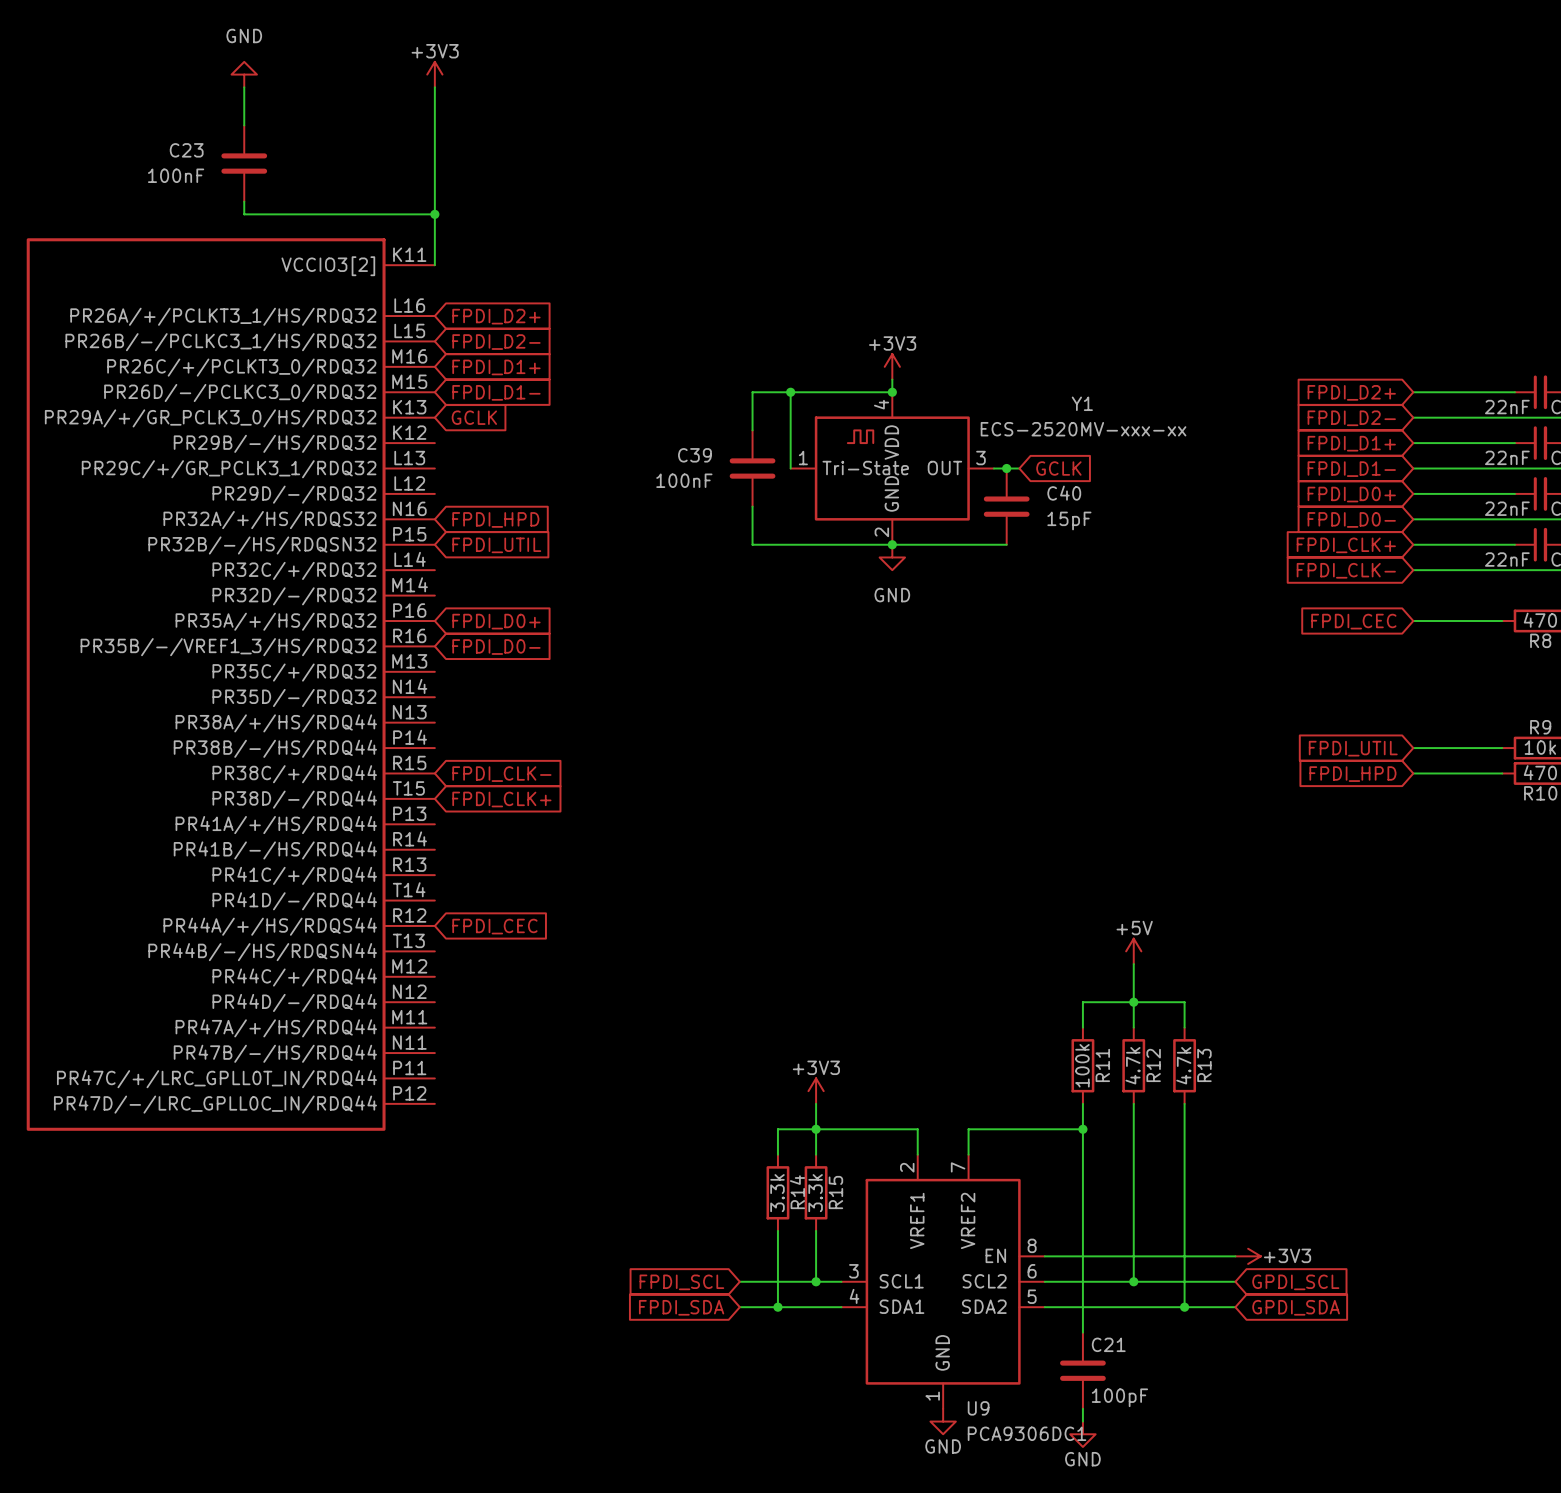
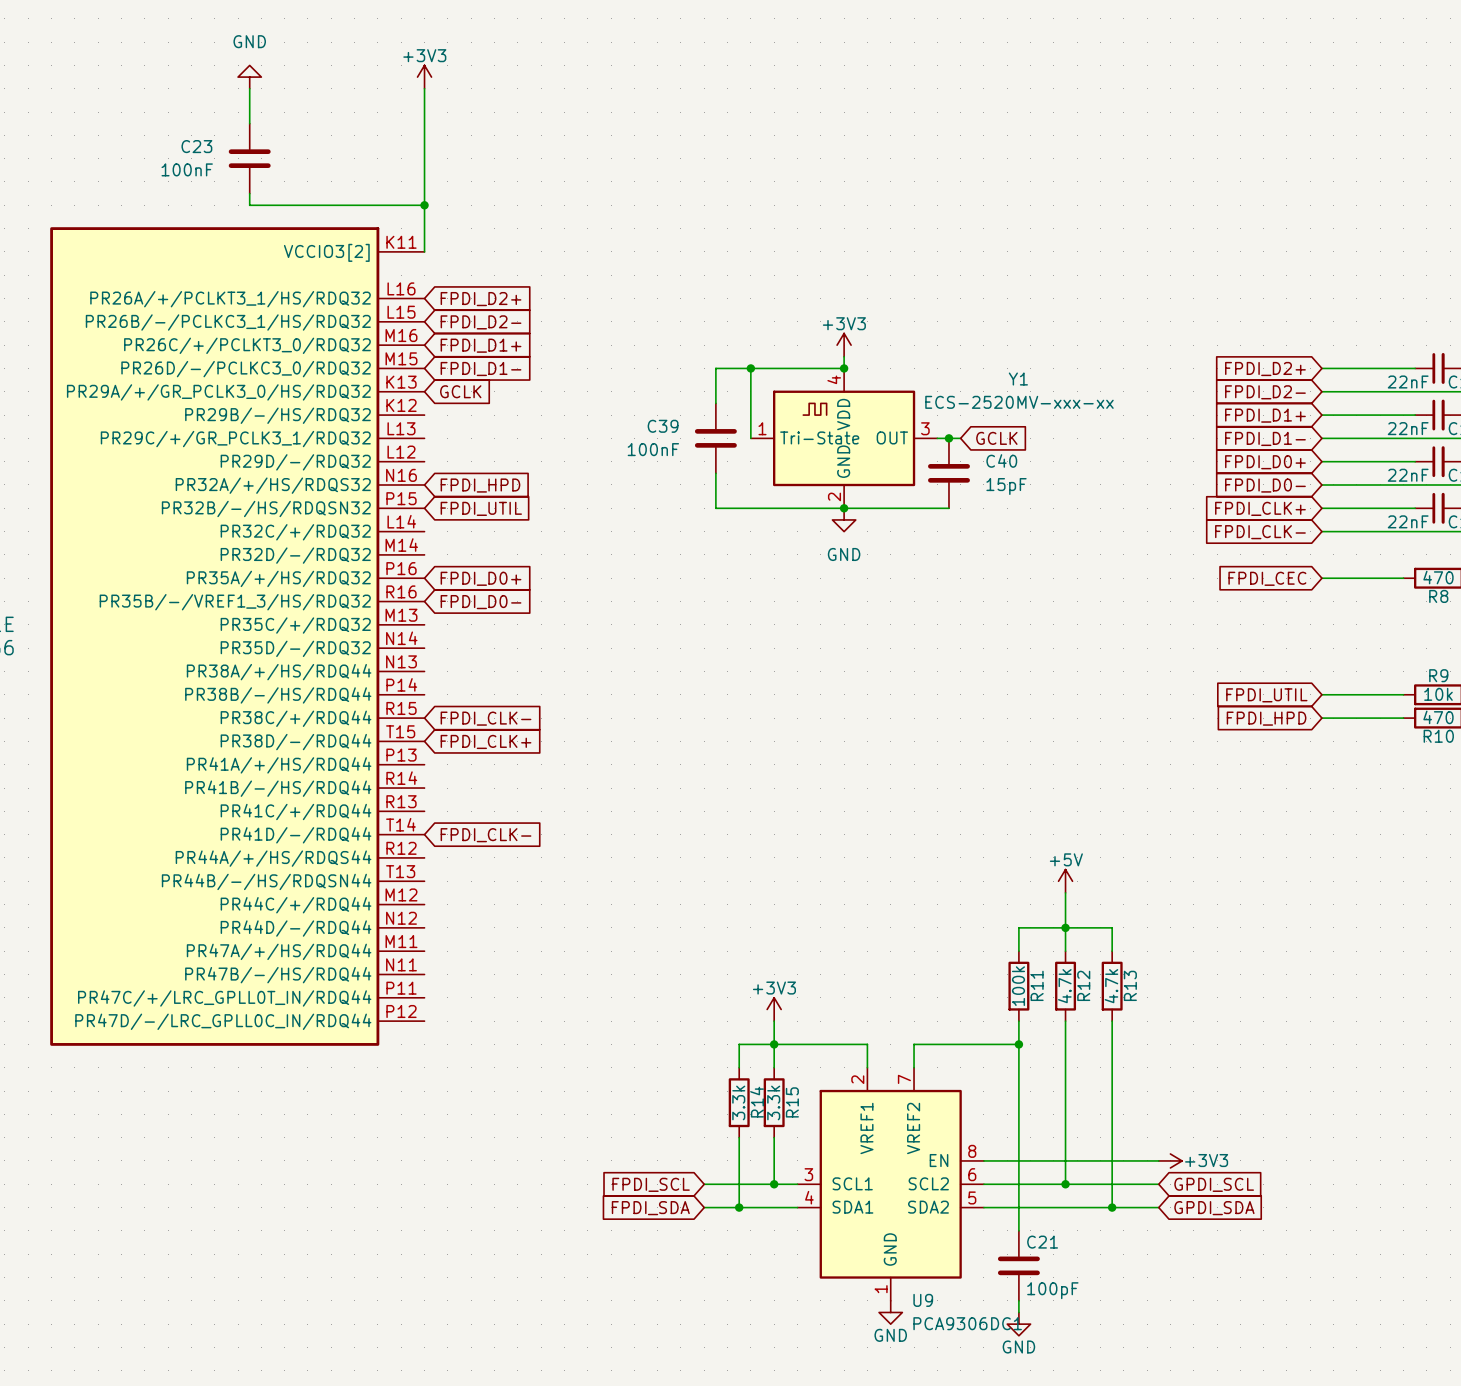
global label: FPDI_CEC (494, 926) -> FPDI_CLK- (486, 835)

